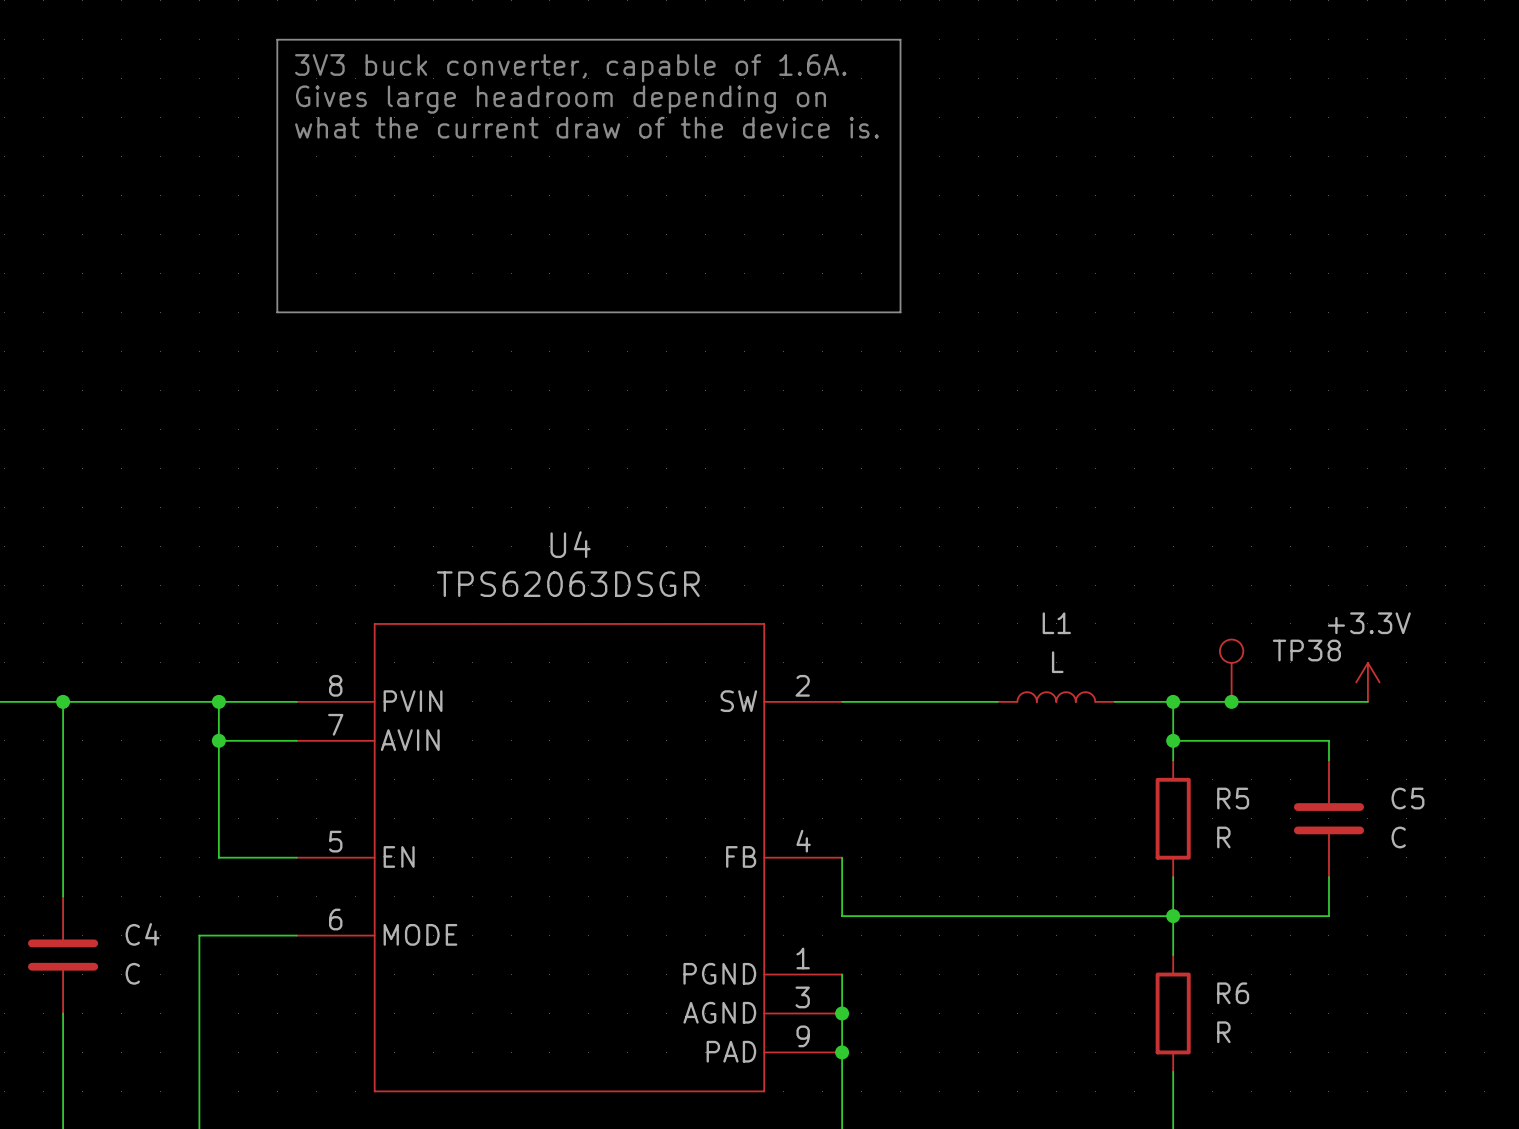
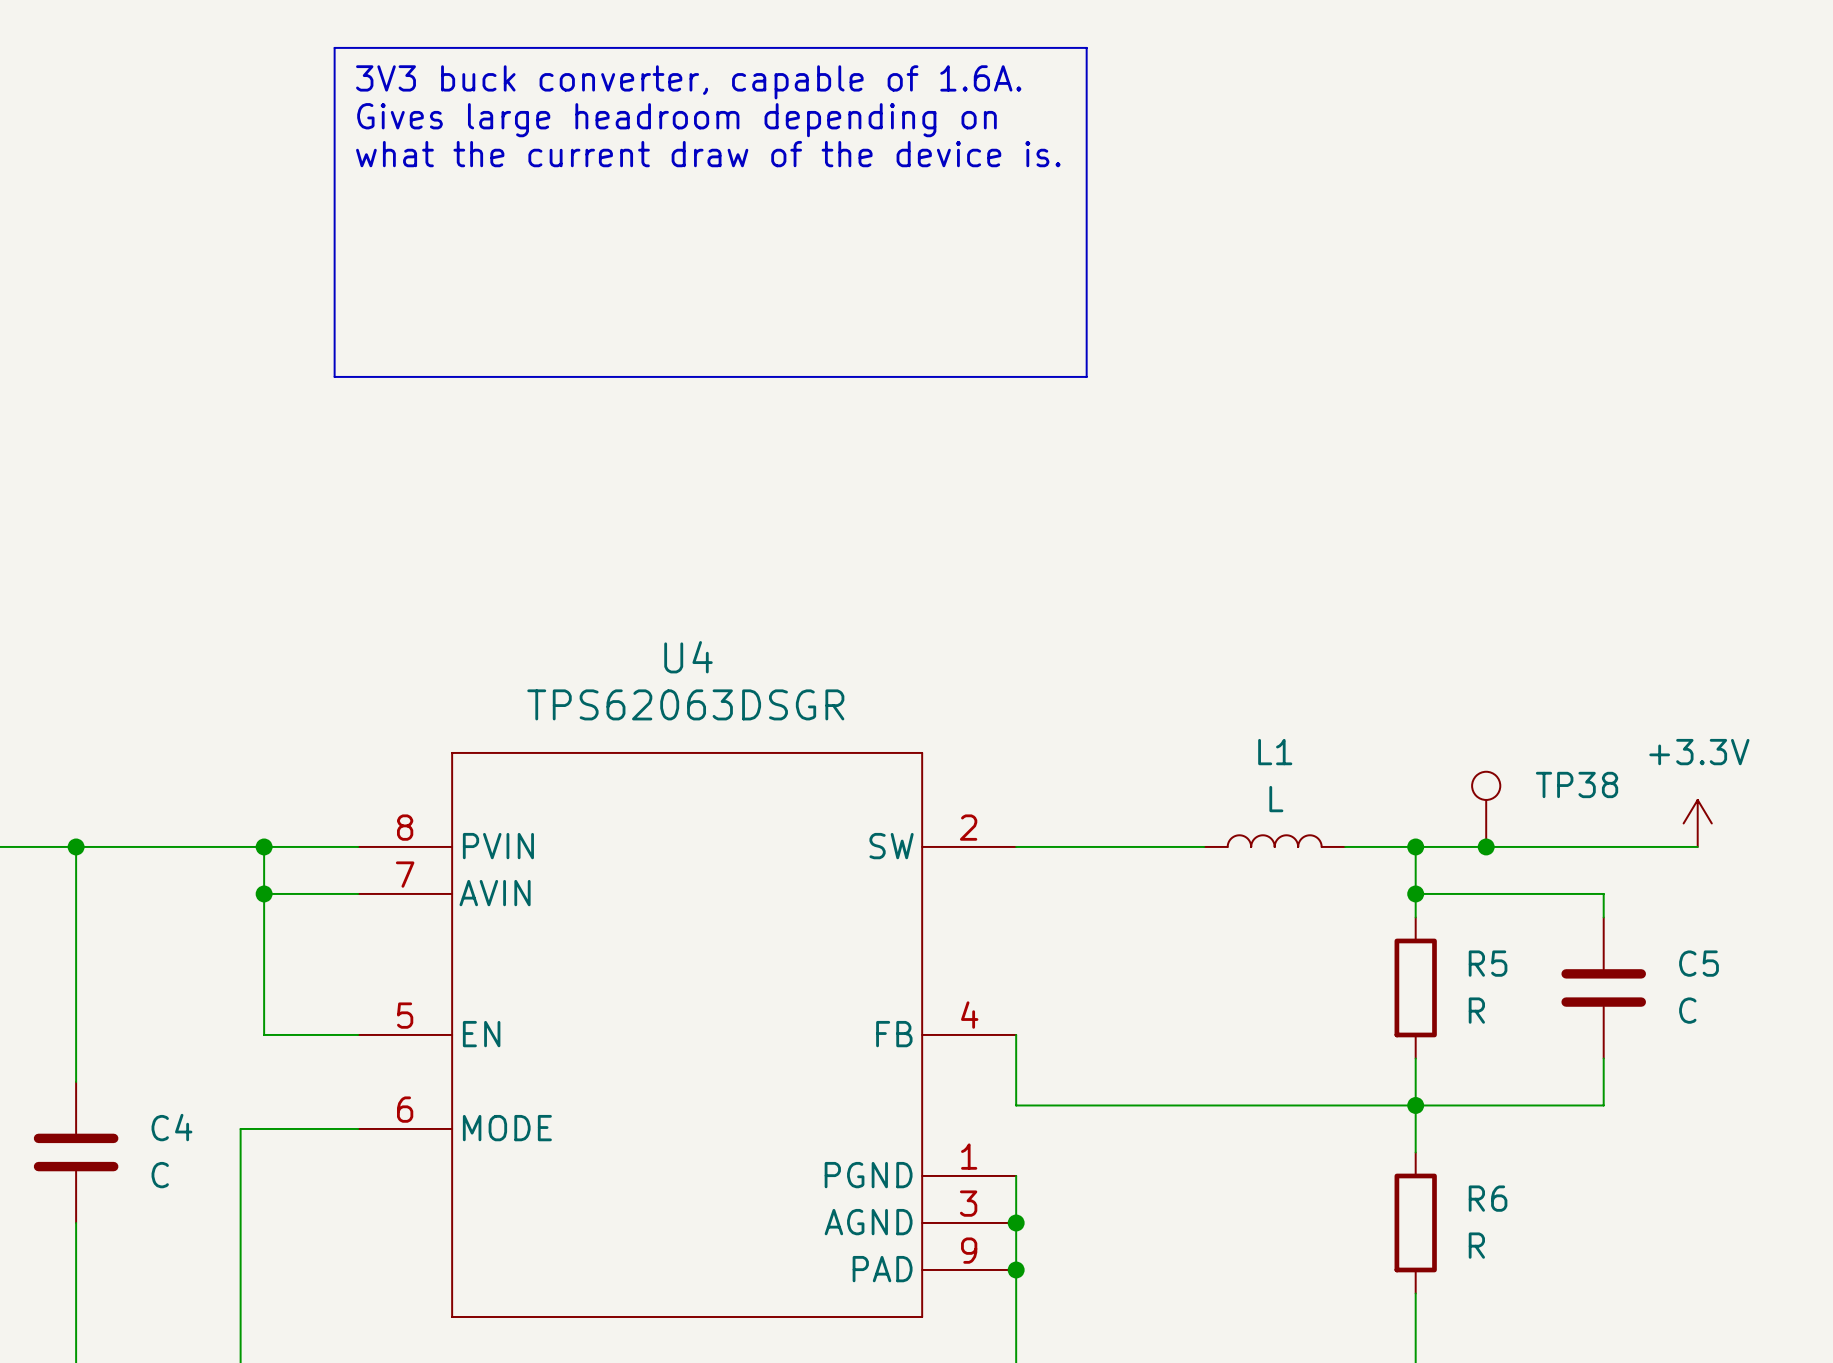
power symbol position: +3.3V (1367, 682) -> +3.3V (1697, 823)
wire: none -> (1650, 846) (1697, 846)

